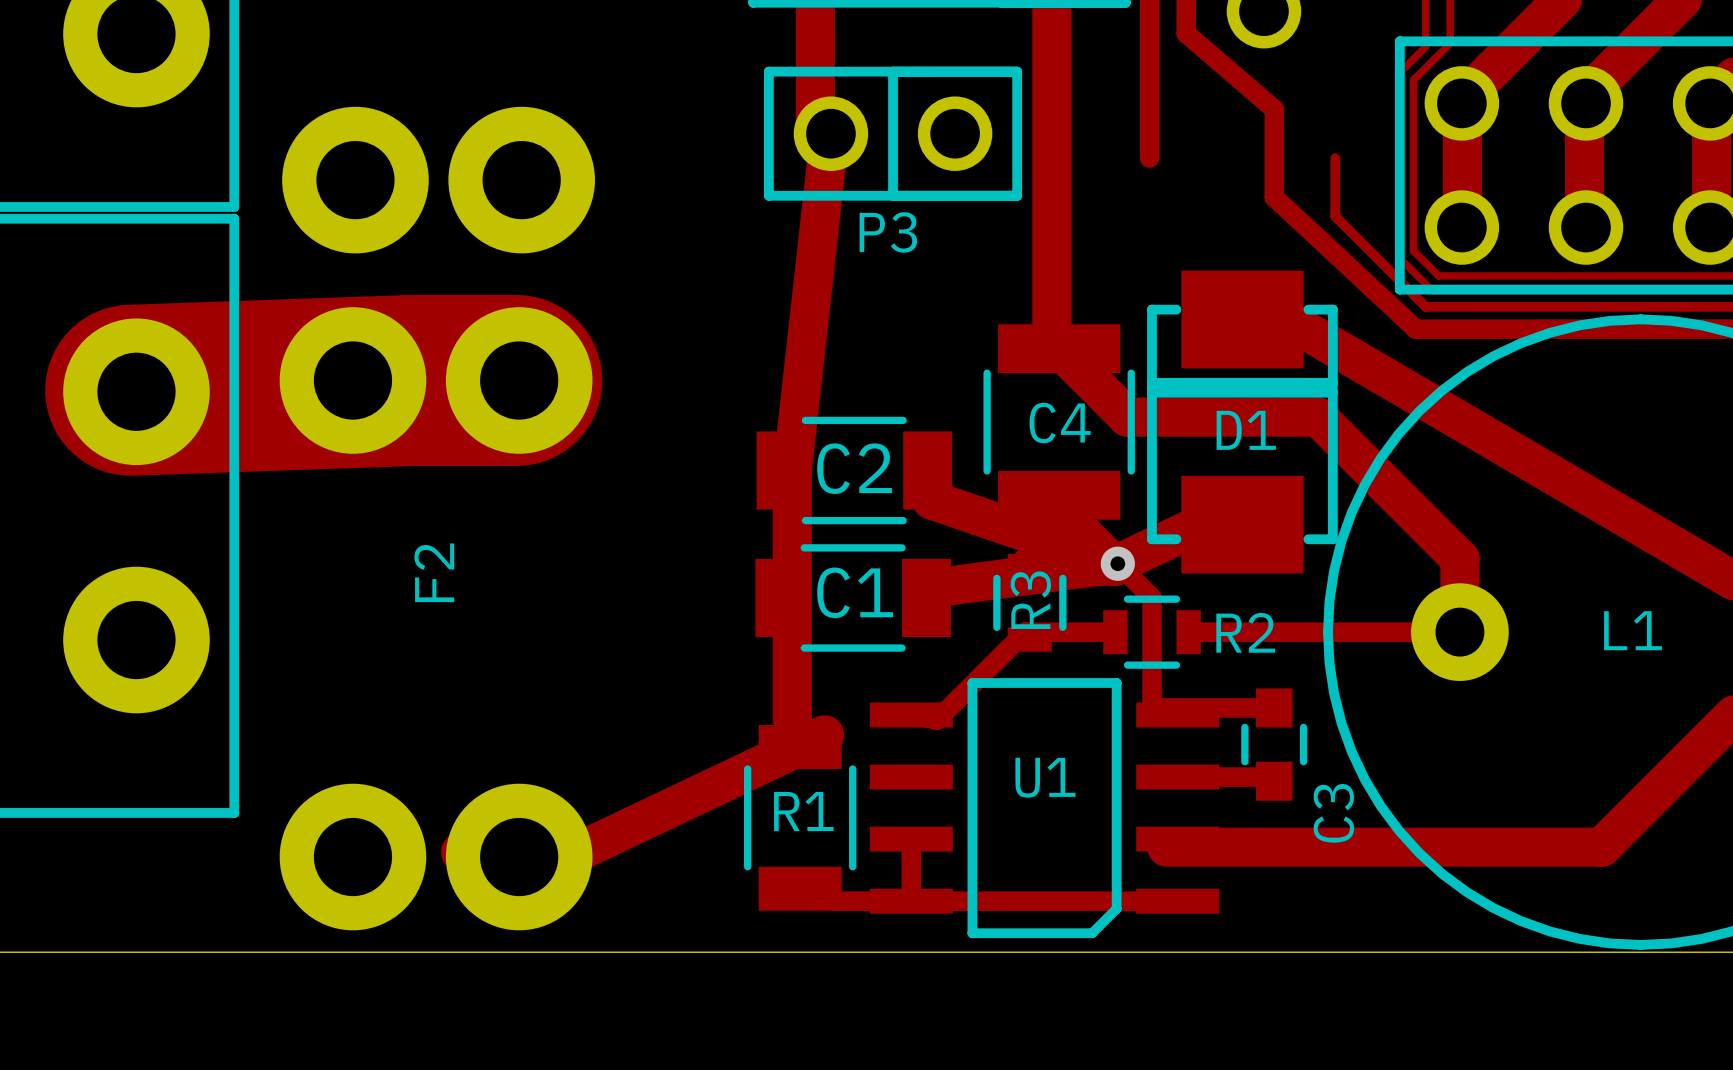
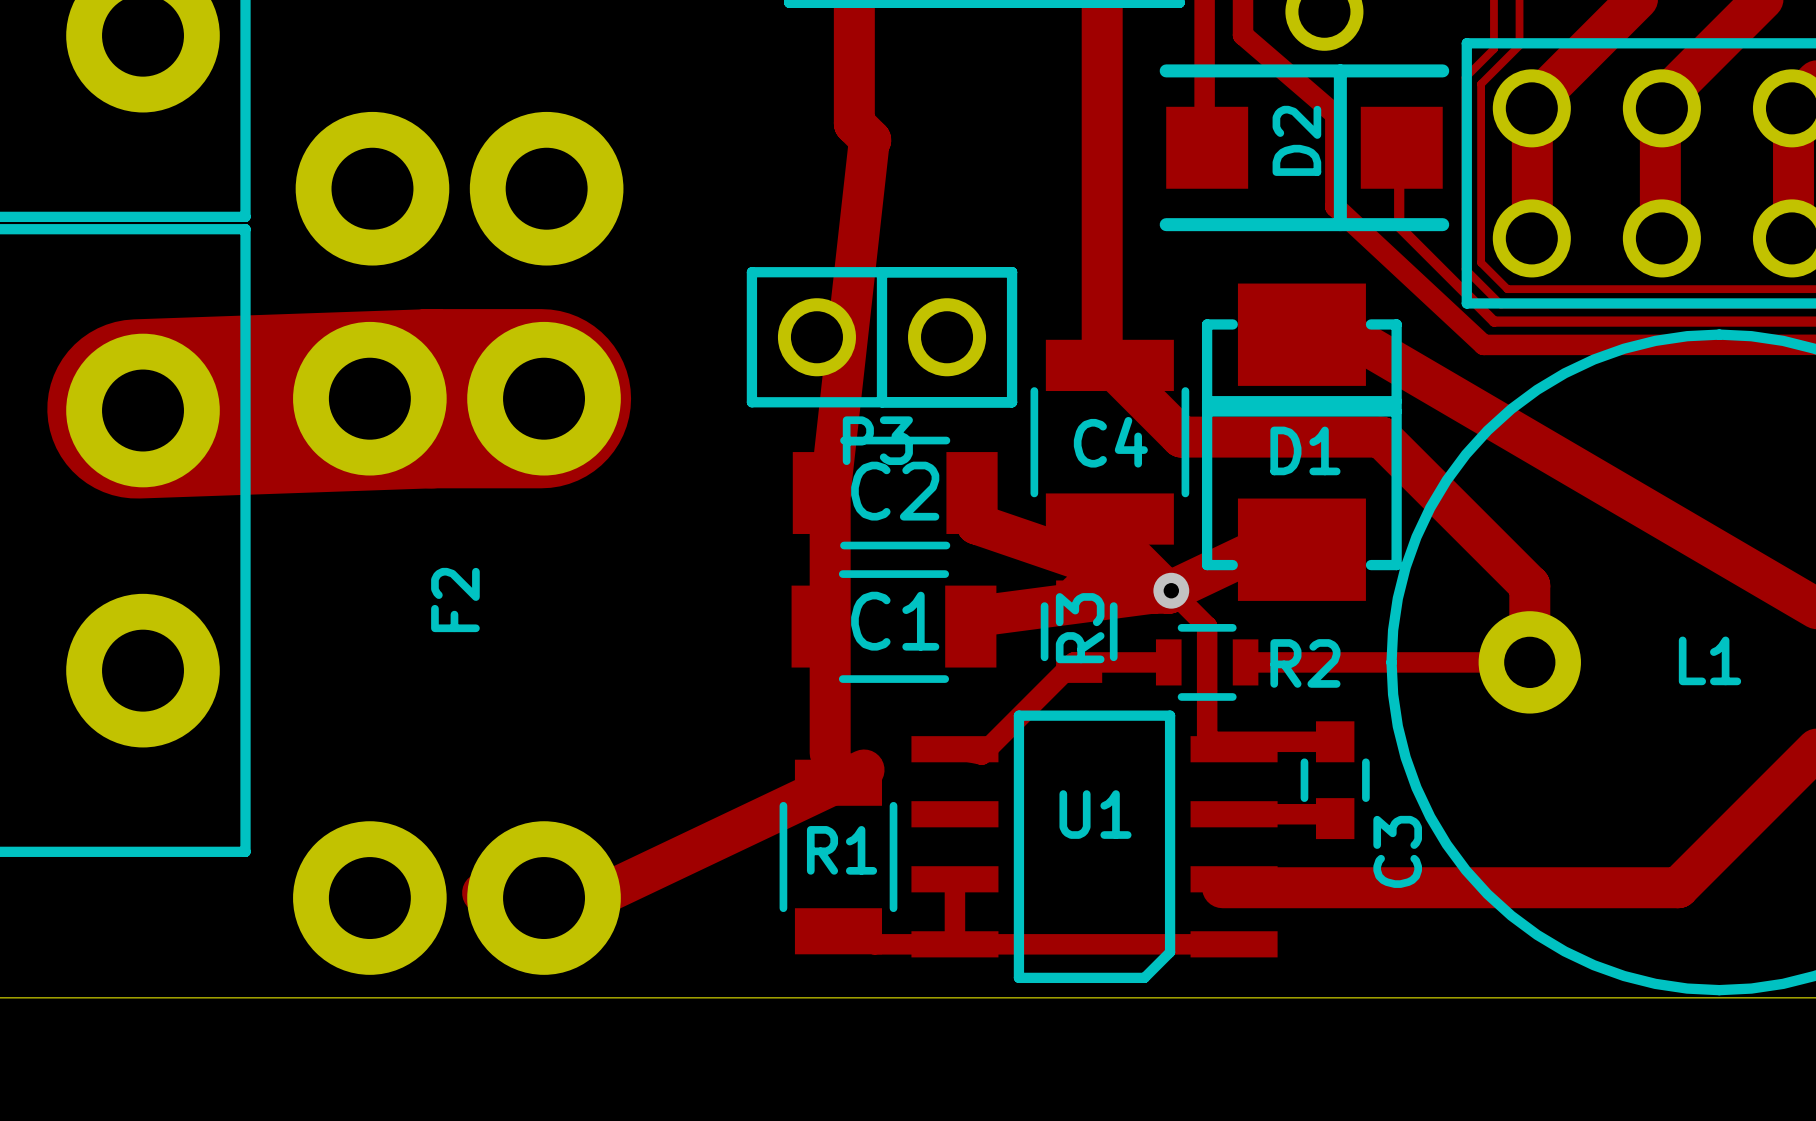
P3 position: (893, 133) -> (882, 337)
D2: none -> (1304, 147)

